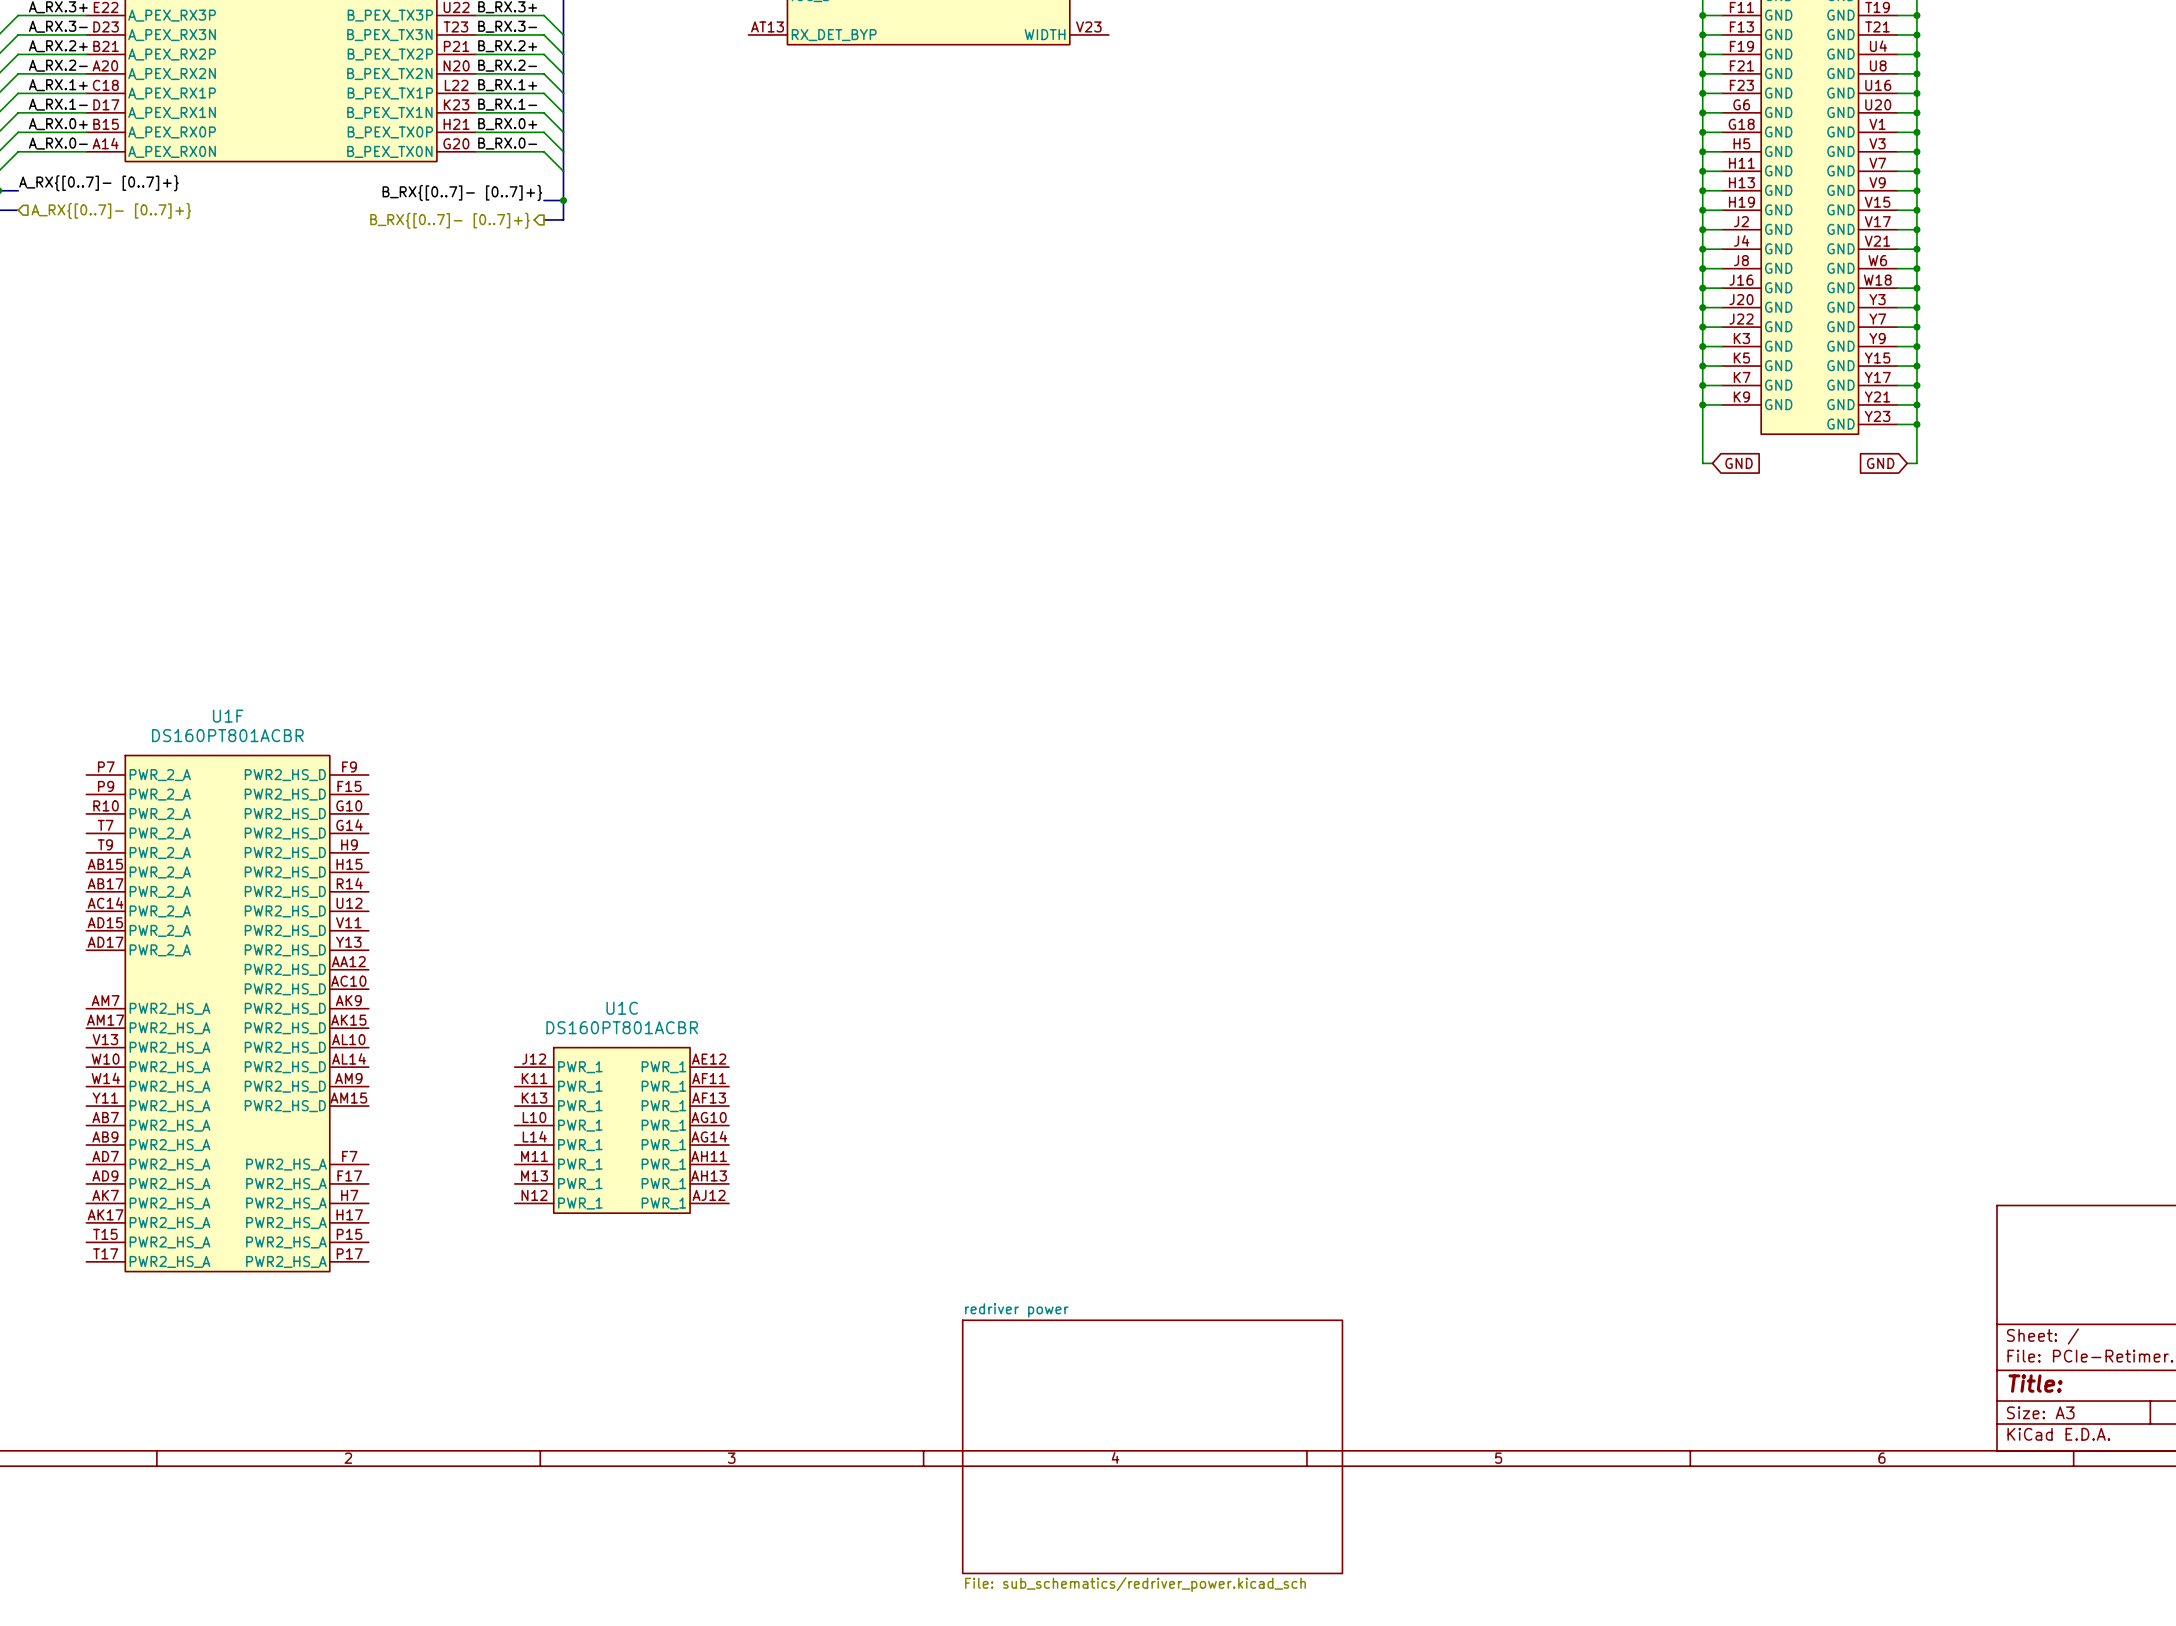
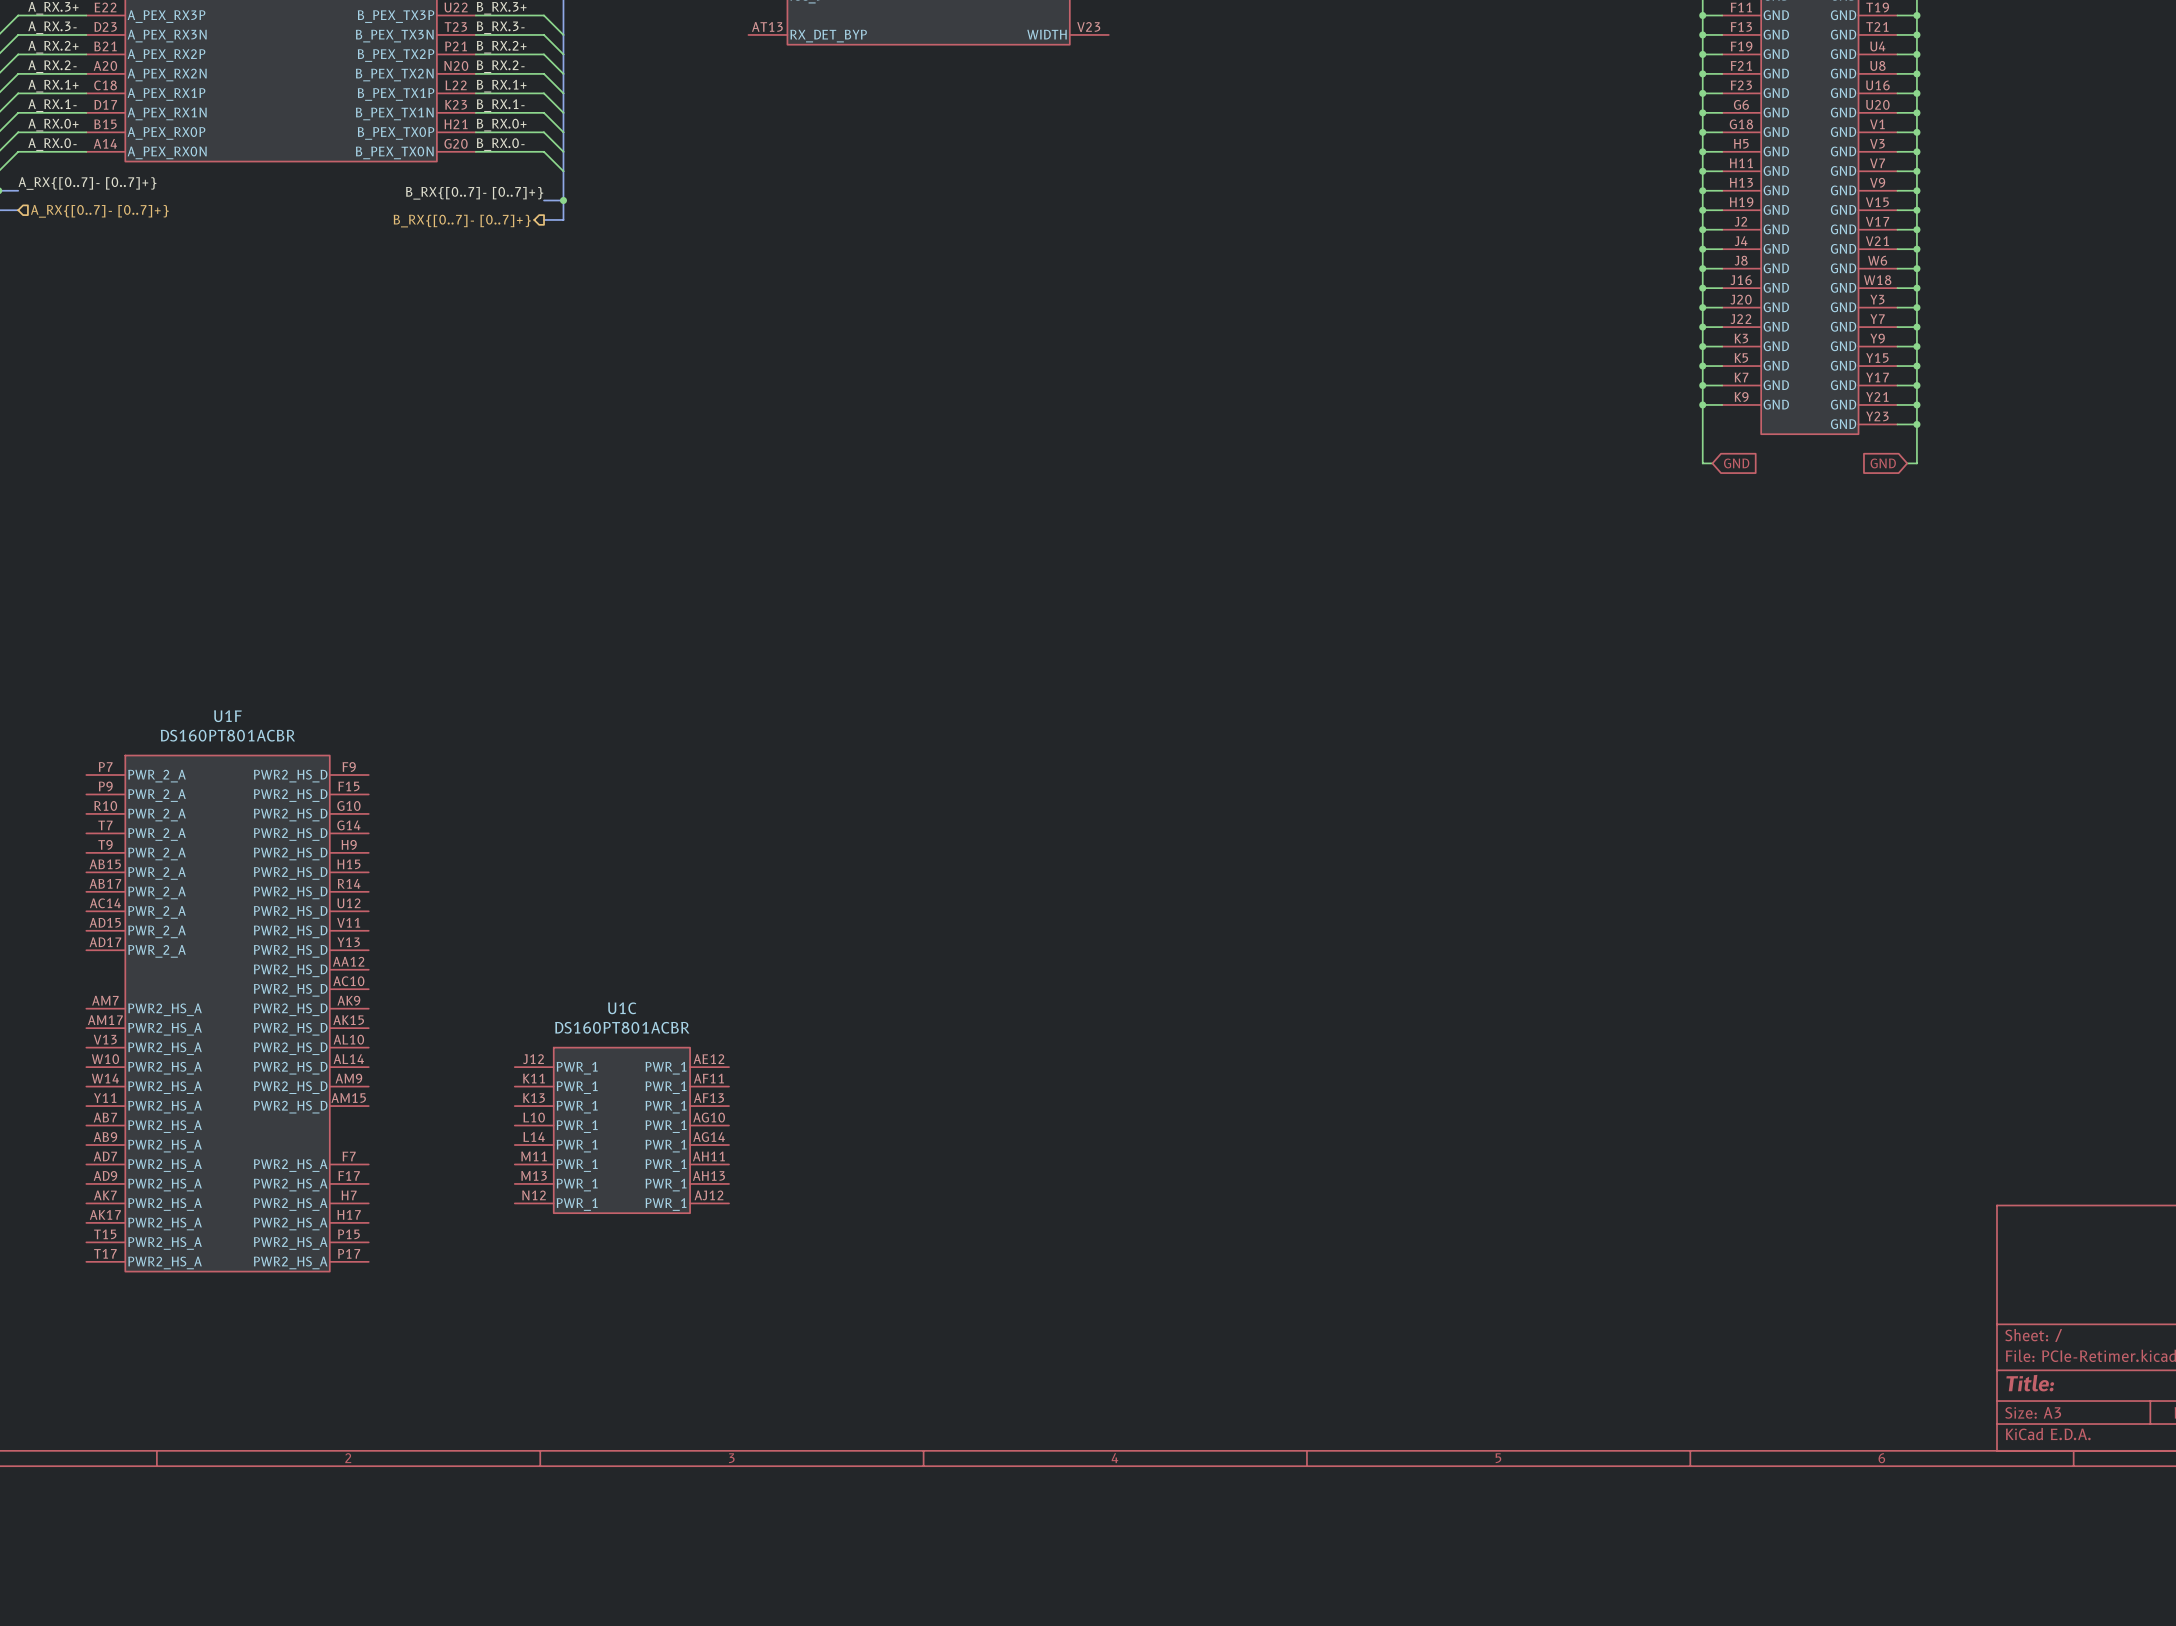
sheet redriver power: File: sub_schematics/redriver_power.kicad_sch (1152, 1446) -> none

